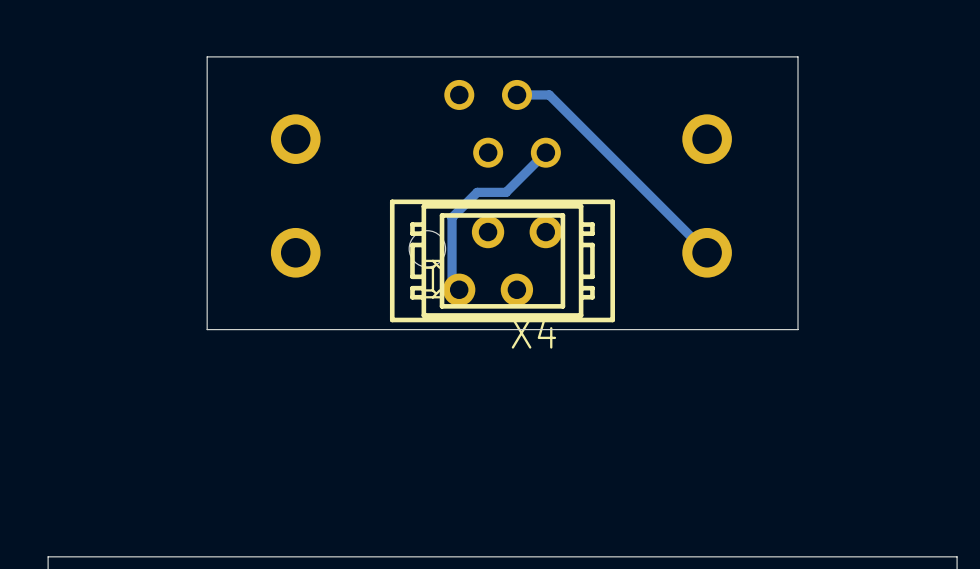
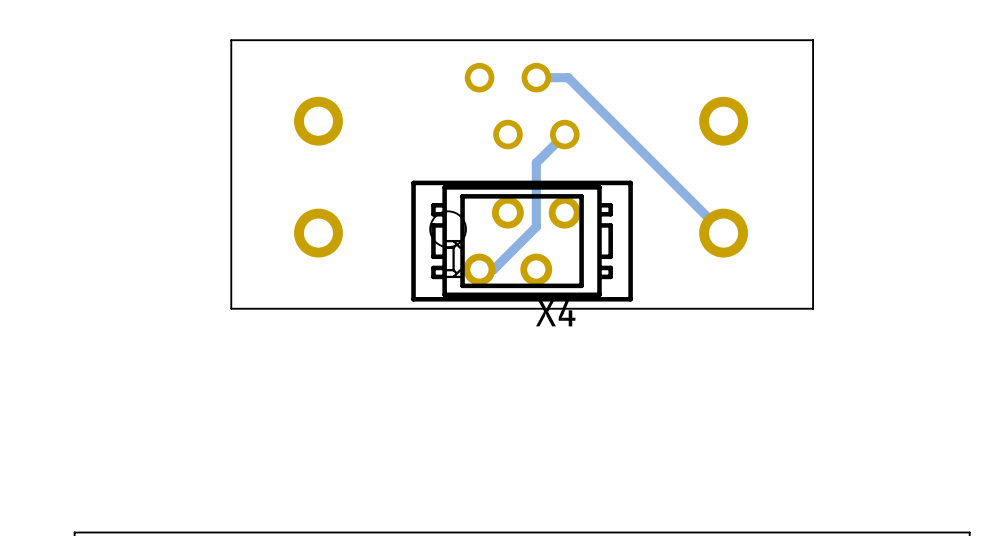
track: (516, 181) (506, 192) (477, 192) (452, 217) (452, 282) (459, 289) -> (536, 163) (536, 226) (493, 269) (479, 269)

